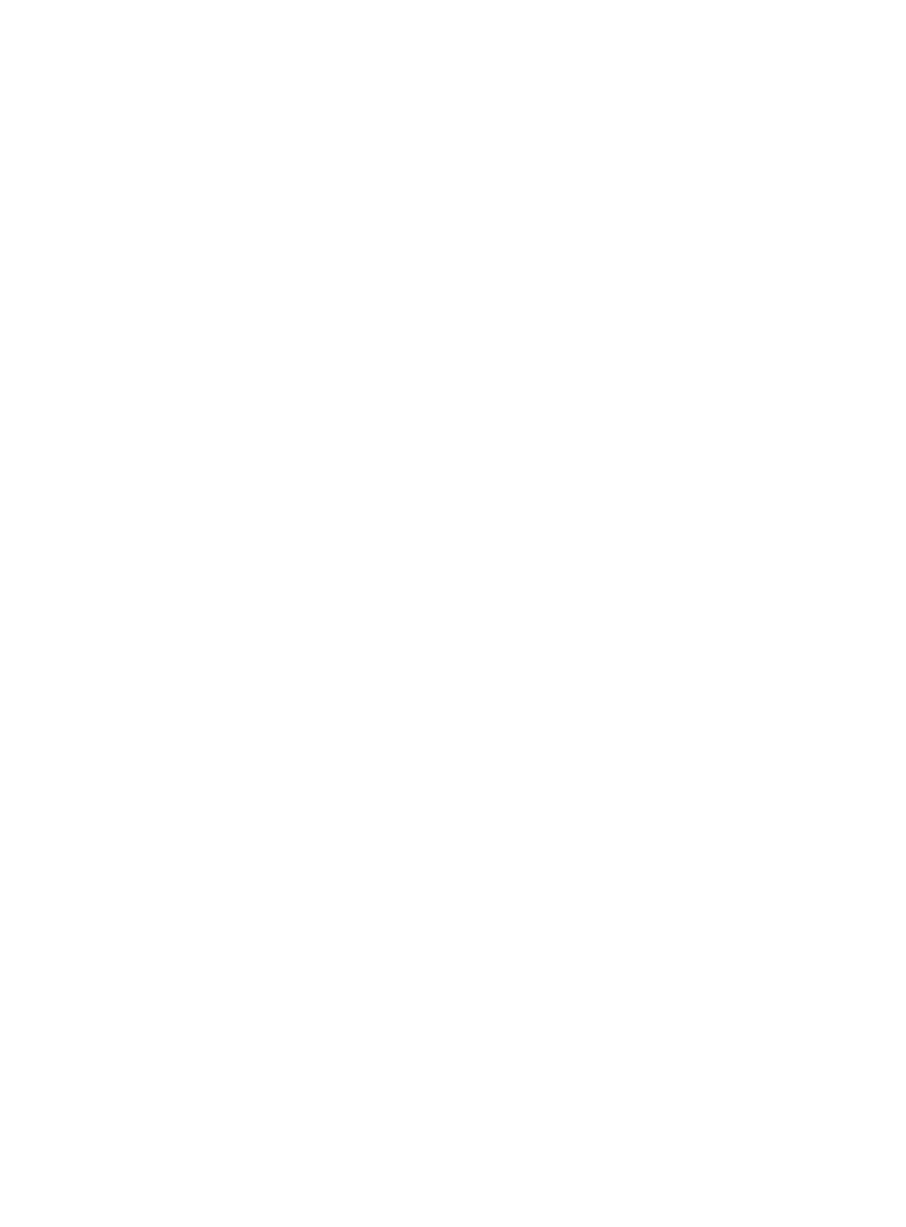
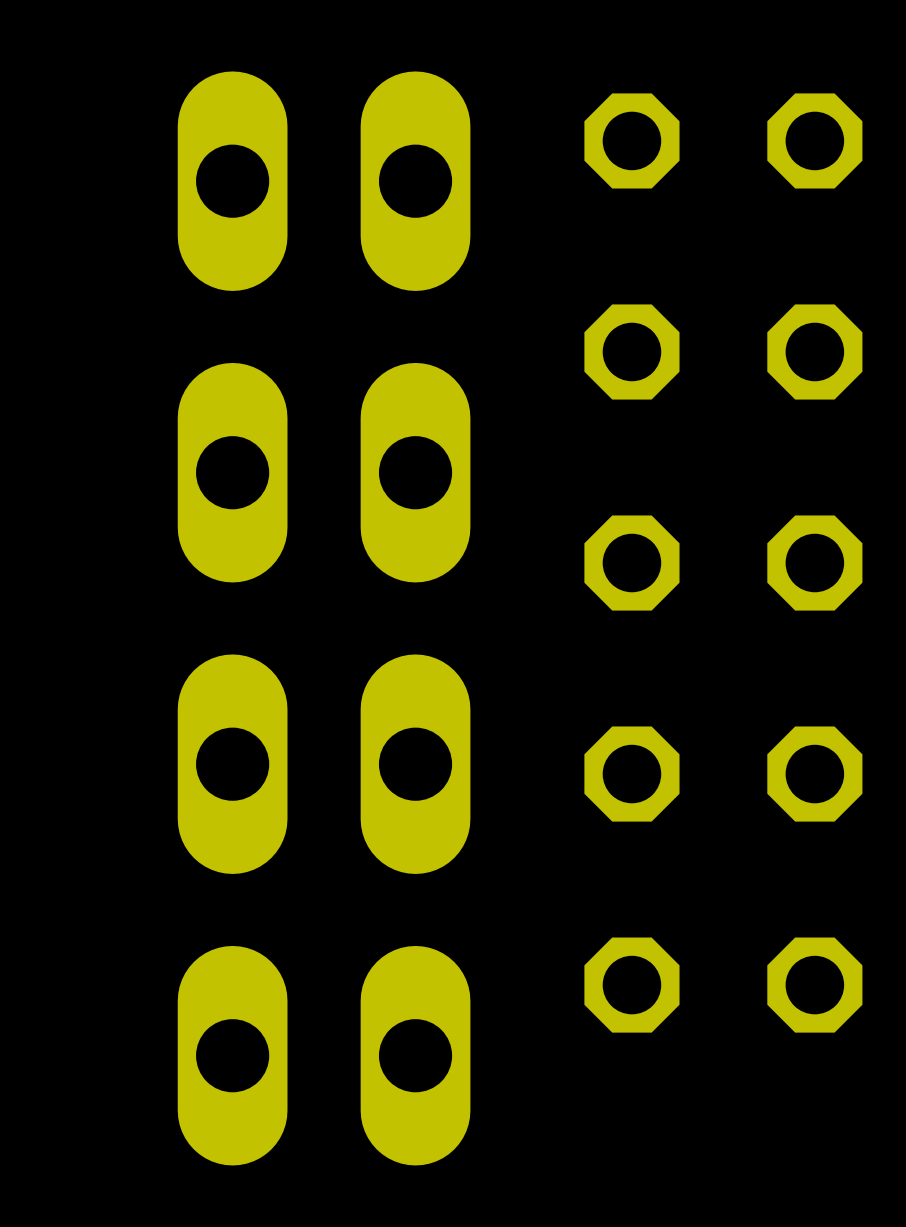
part: none -> (723, 140)
part: none -> (324, 181)
part: none -> (723, 351)
part: none -> (324, 472)
part: none -> (723, 563)
part: none -> (324, 764)
part: none -> (723, 774)
part: none -> (723, 985)
part: none -> (324, 1055)

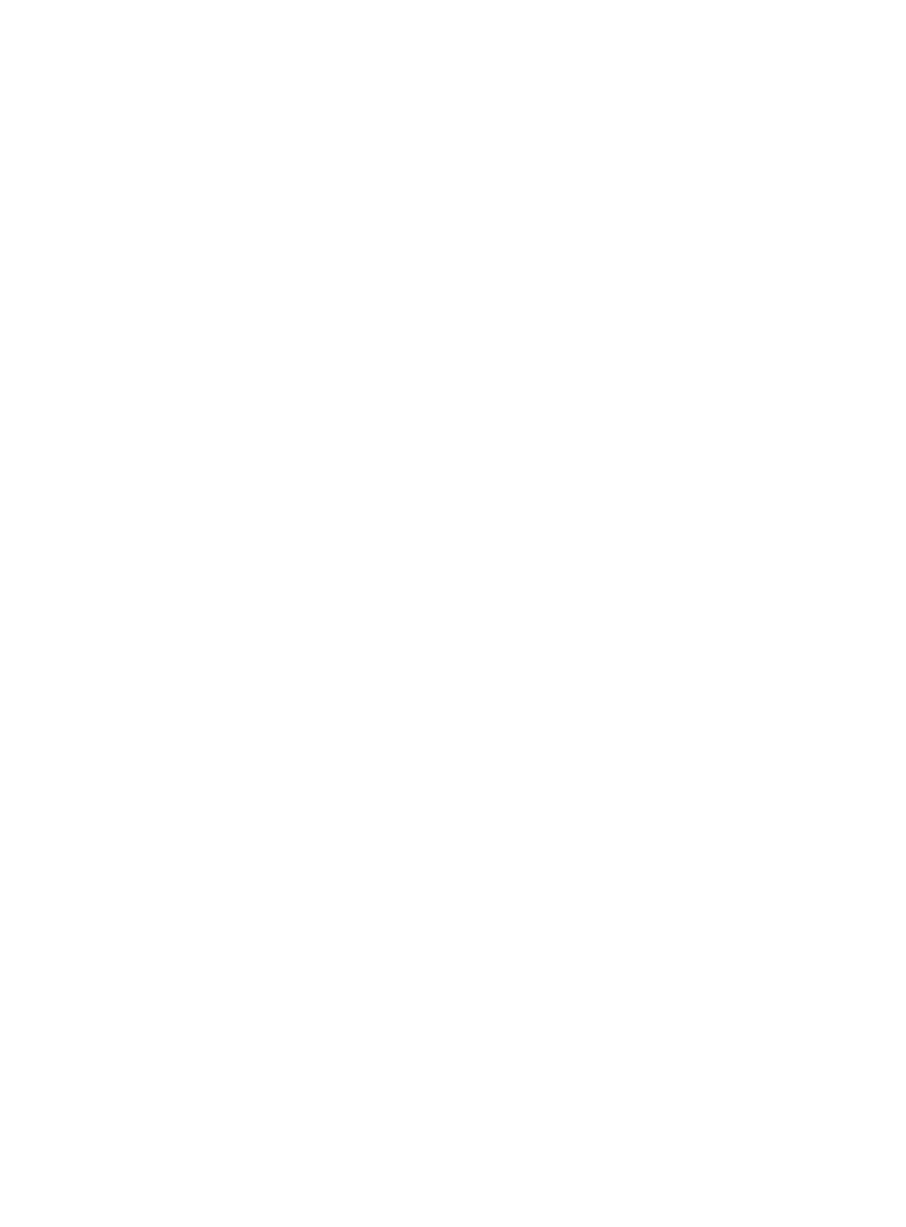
part: (723, 140) -> none
part: (324, 181) -> none
part: (723, 351) -> none
part: (324, 472) -> none
part: (723, 563) -> none
part: (324, 764) -> none
part: (723, 774) -> none
part: (723, 985) -> none
part: (324, 1055) -> none

